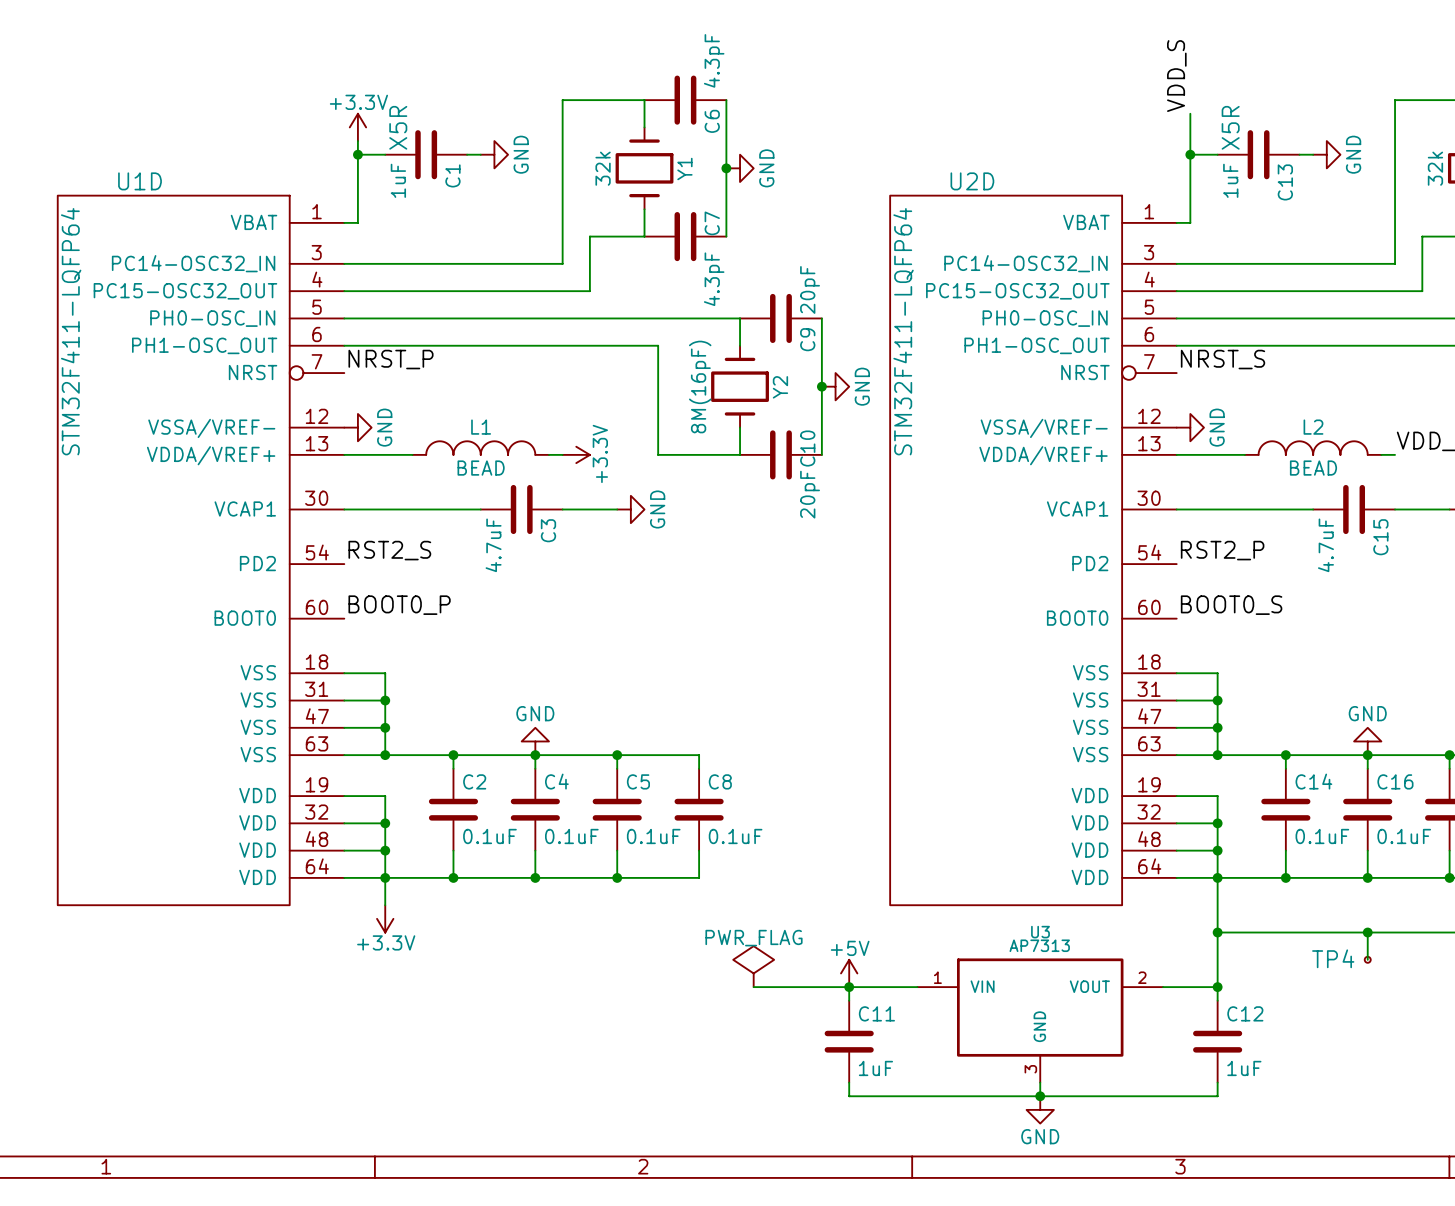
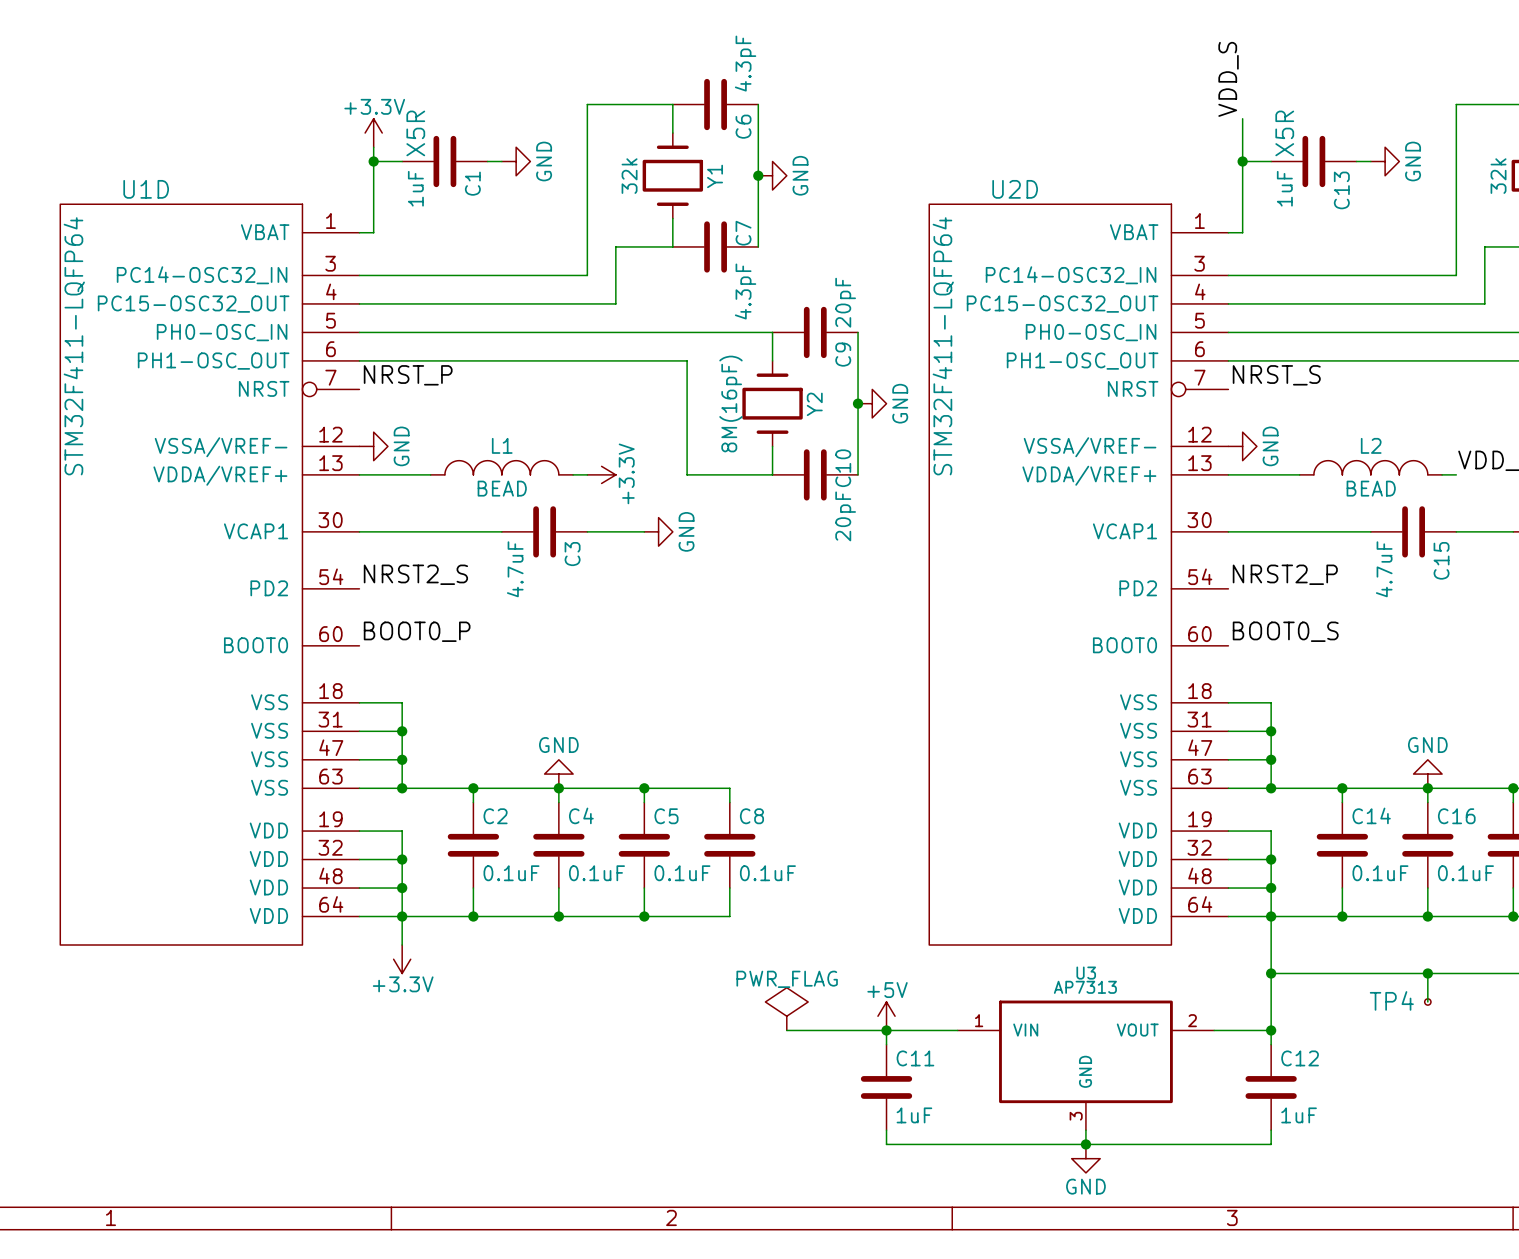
label: RST2_S (389, 550) -> NRST2_S (415, 574)
label: RST2_P (1222, 550) -> NRST2_P (1285, 574)

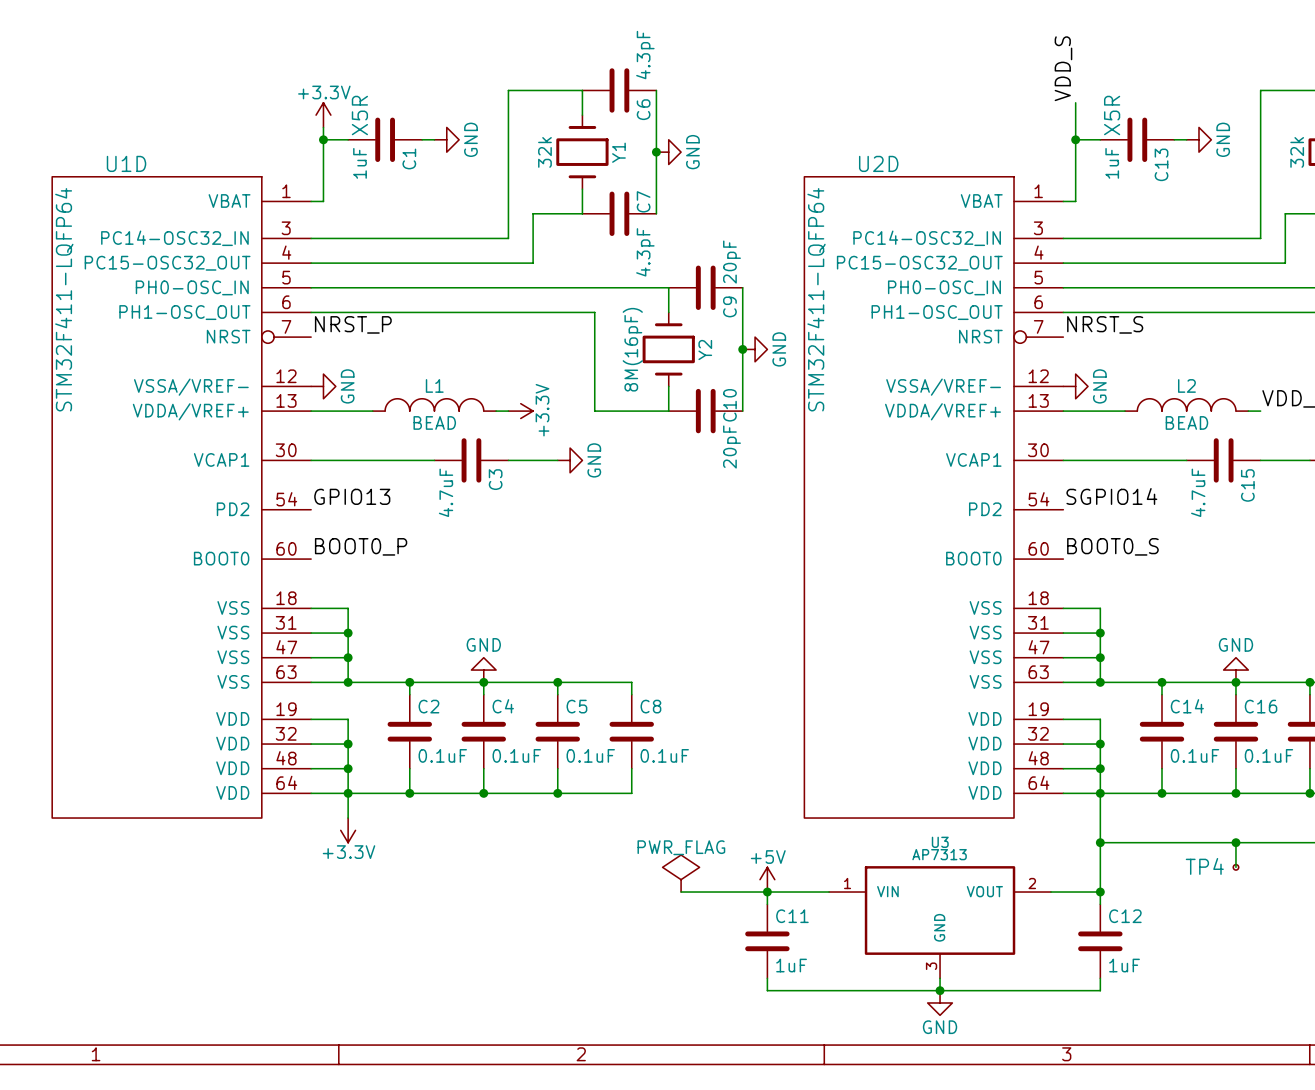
label: NRST2_S (415, 574) -> GPIO13 (352, 496)
label: NRST2_P (1285, 574) -> SGPIO14 (1111, 496)

